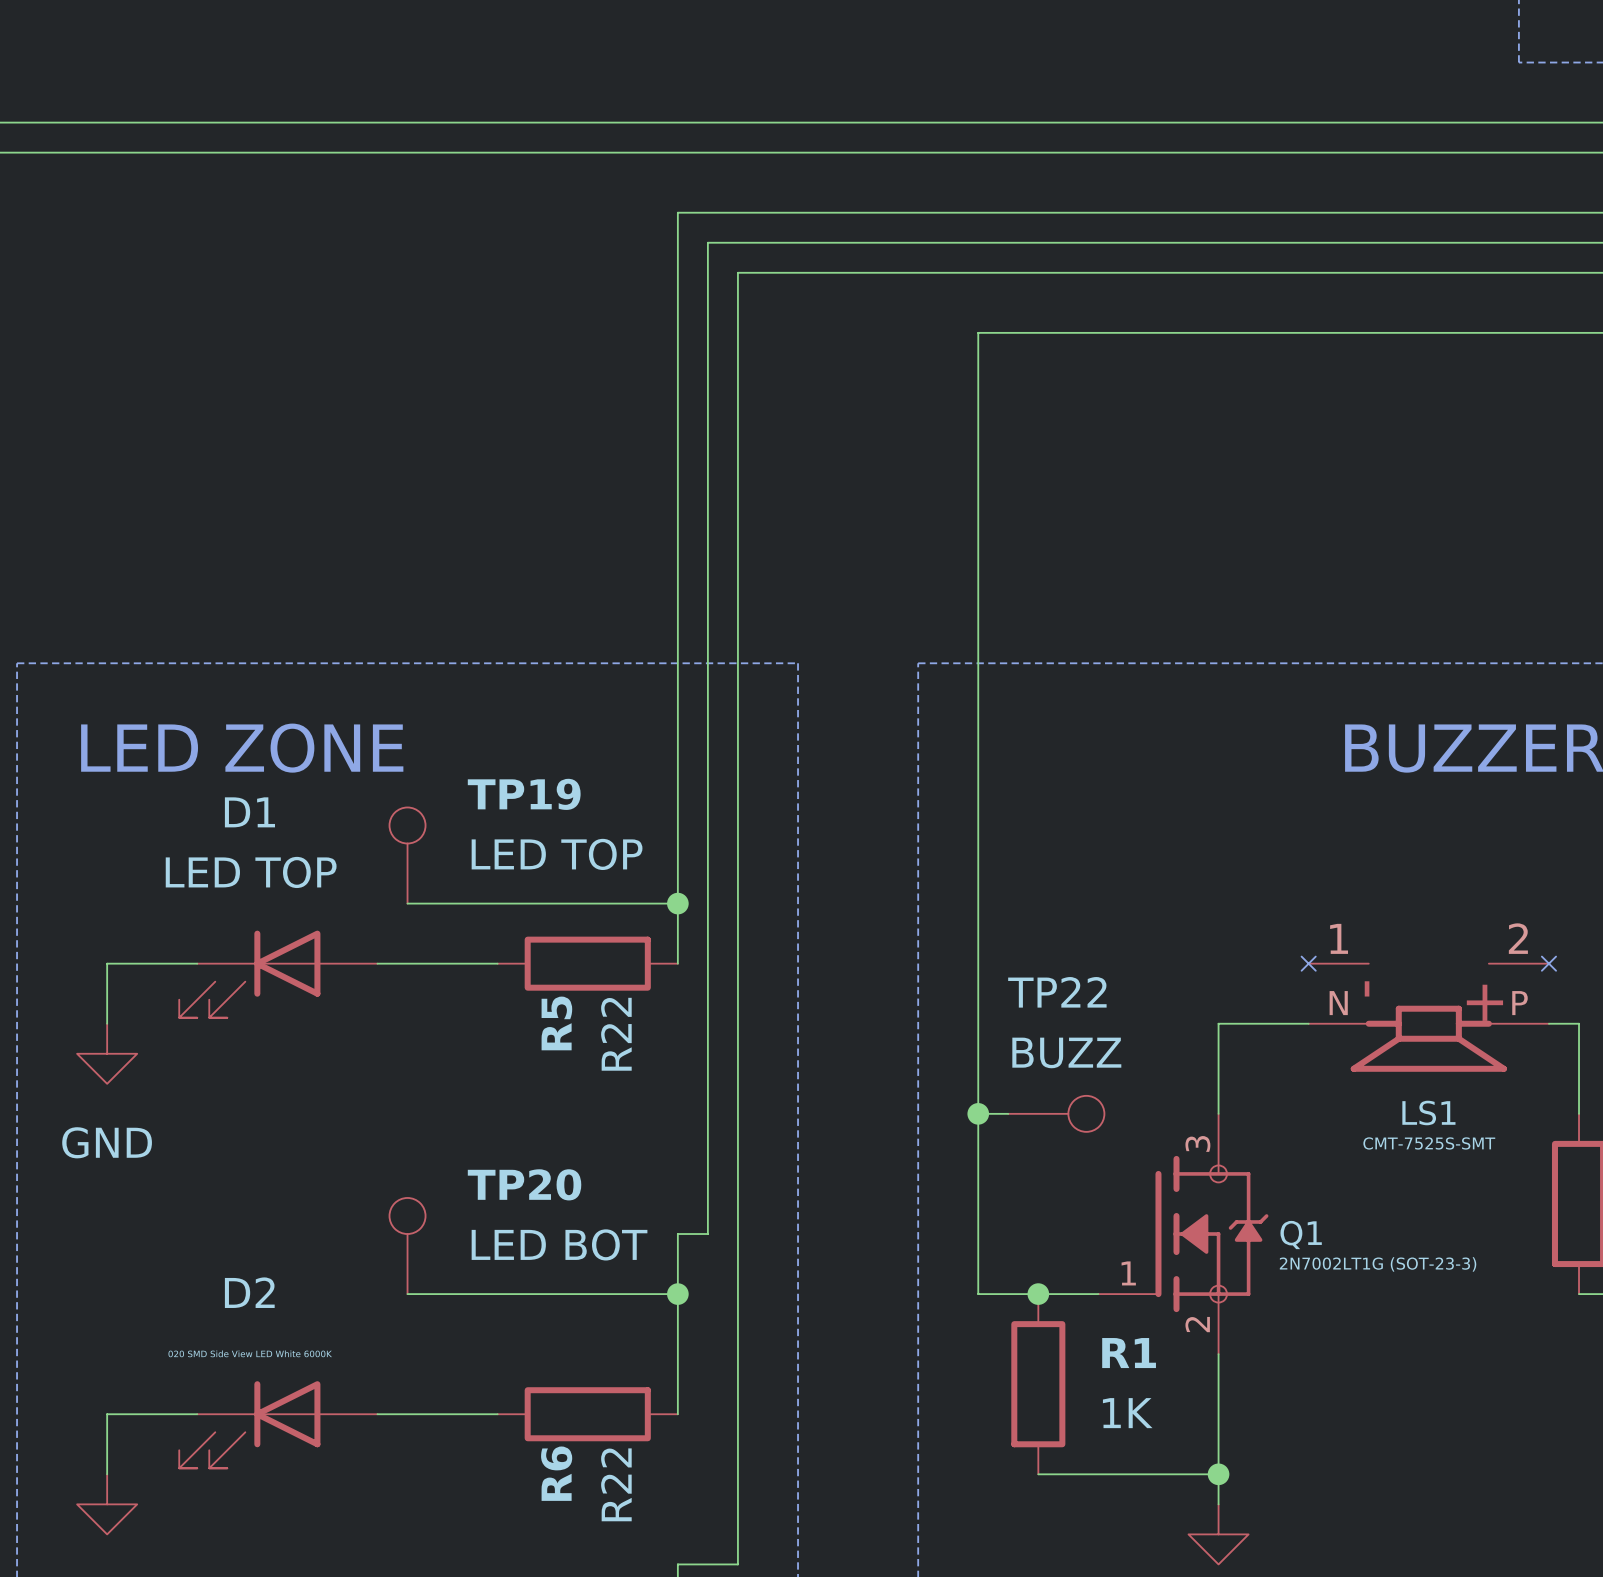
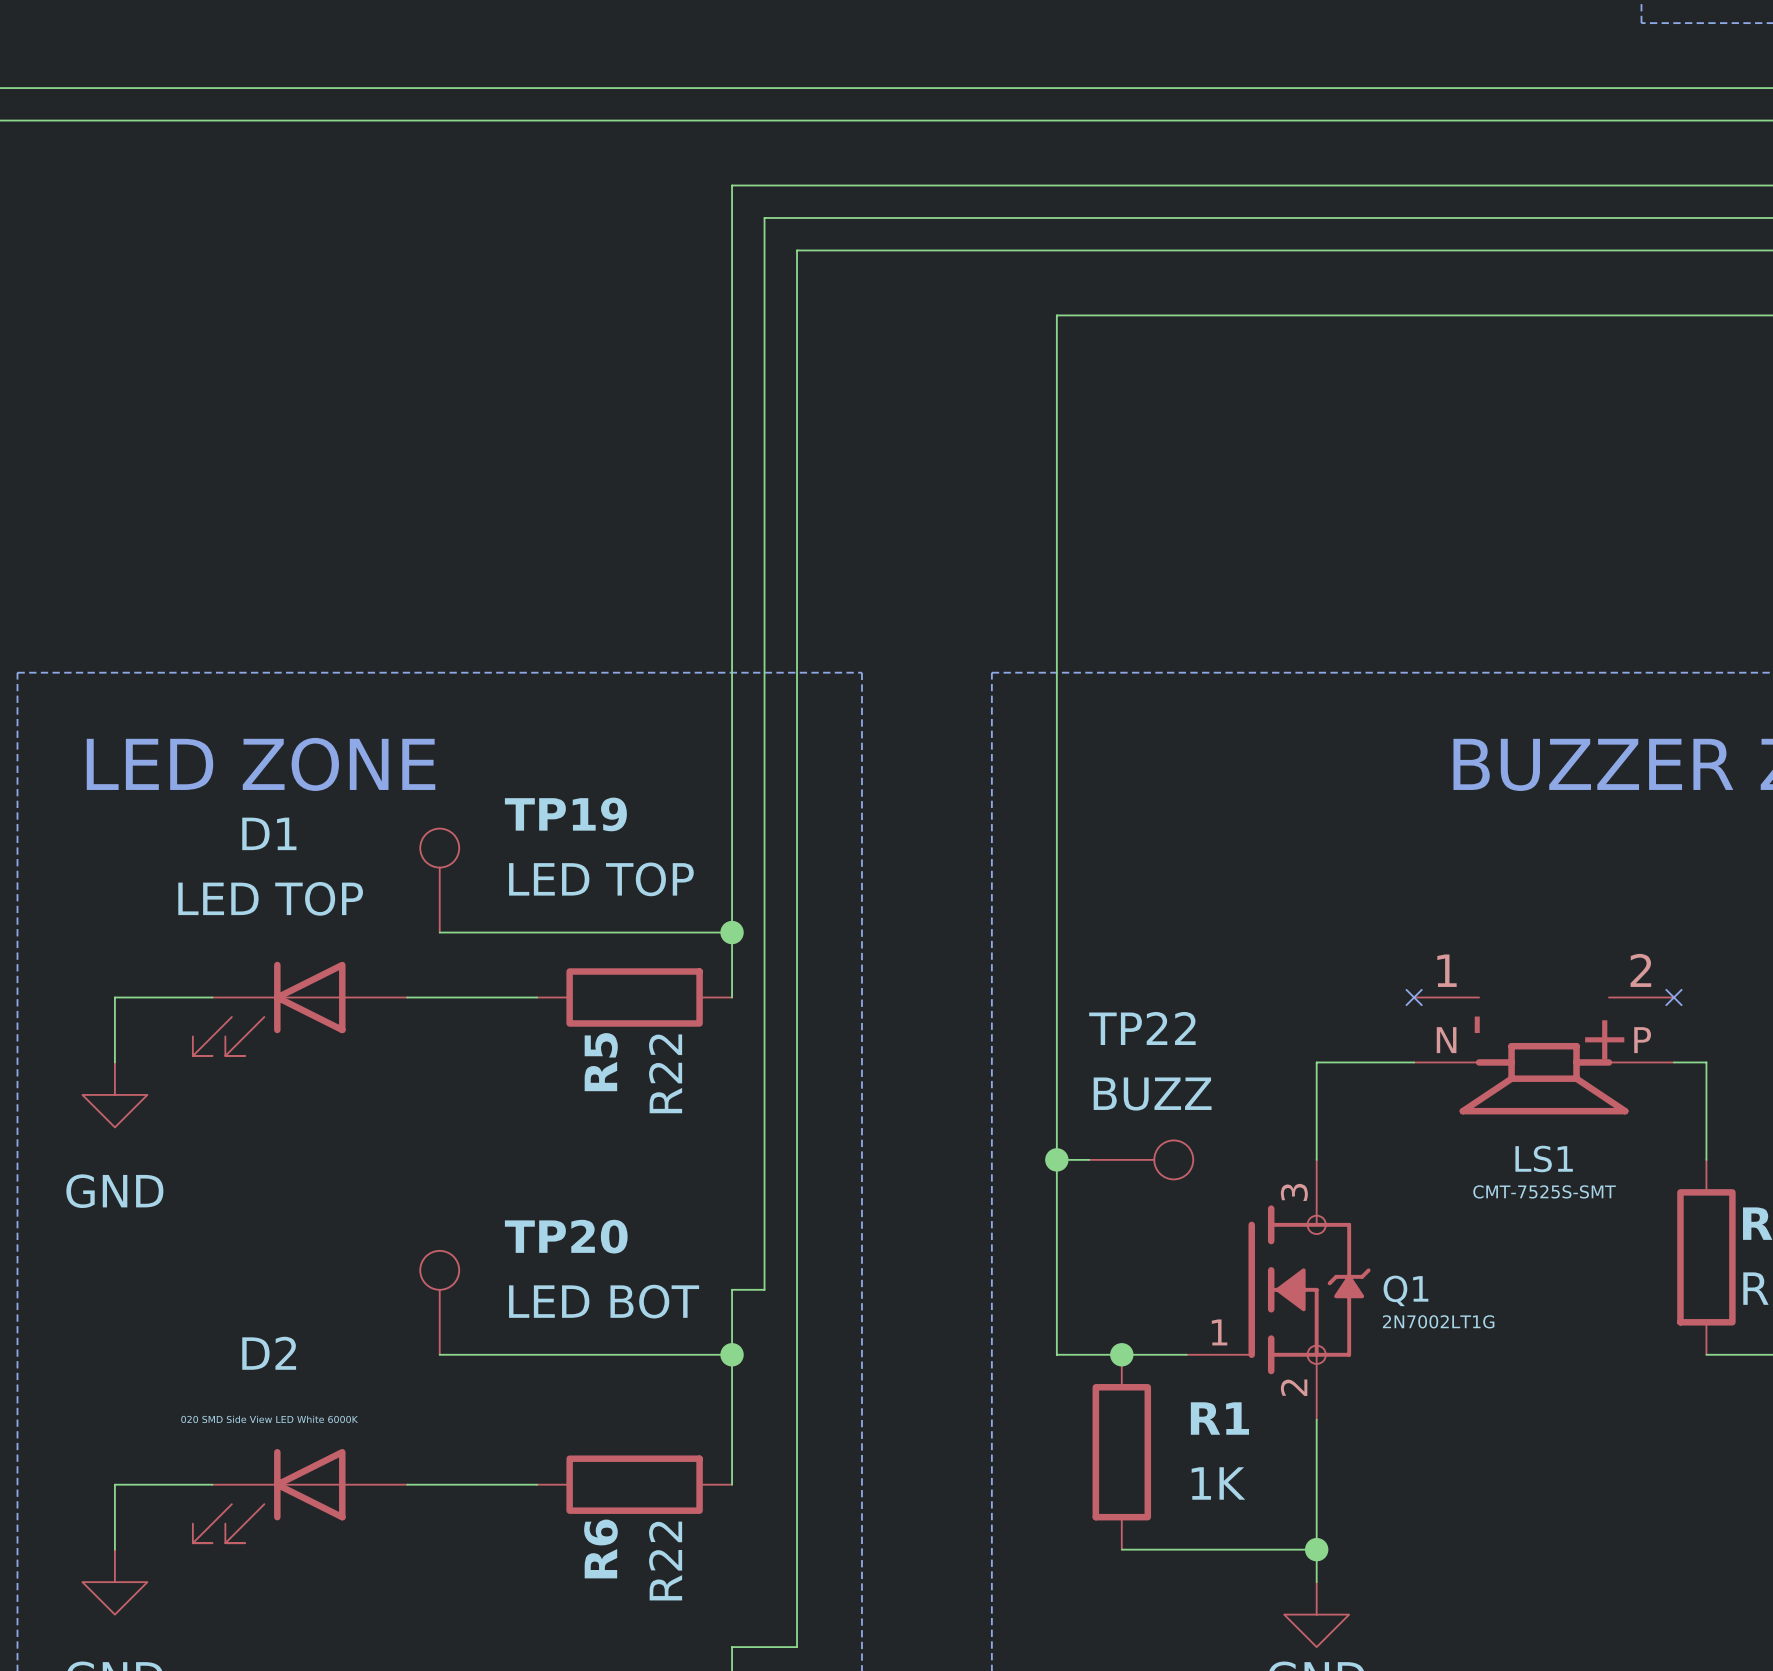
Q1 value: 2N7002LT1G (SOT-23-3) (1378, 1264) -> 2N7002LT1G (1438, 1321)

